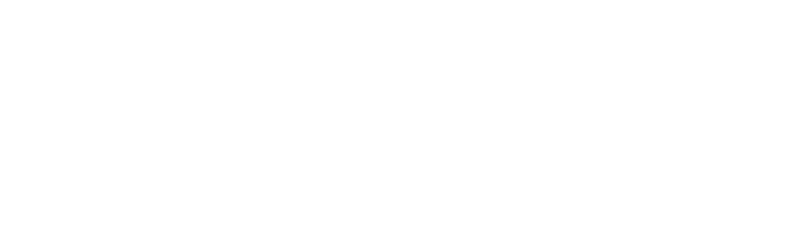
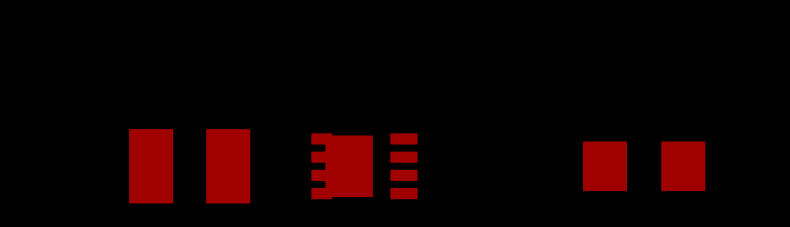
part: none -> (189, 166)
part: none -> (364, 166)
part: none -> (644, 166)

